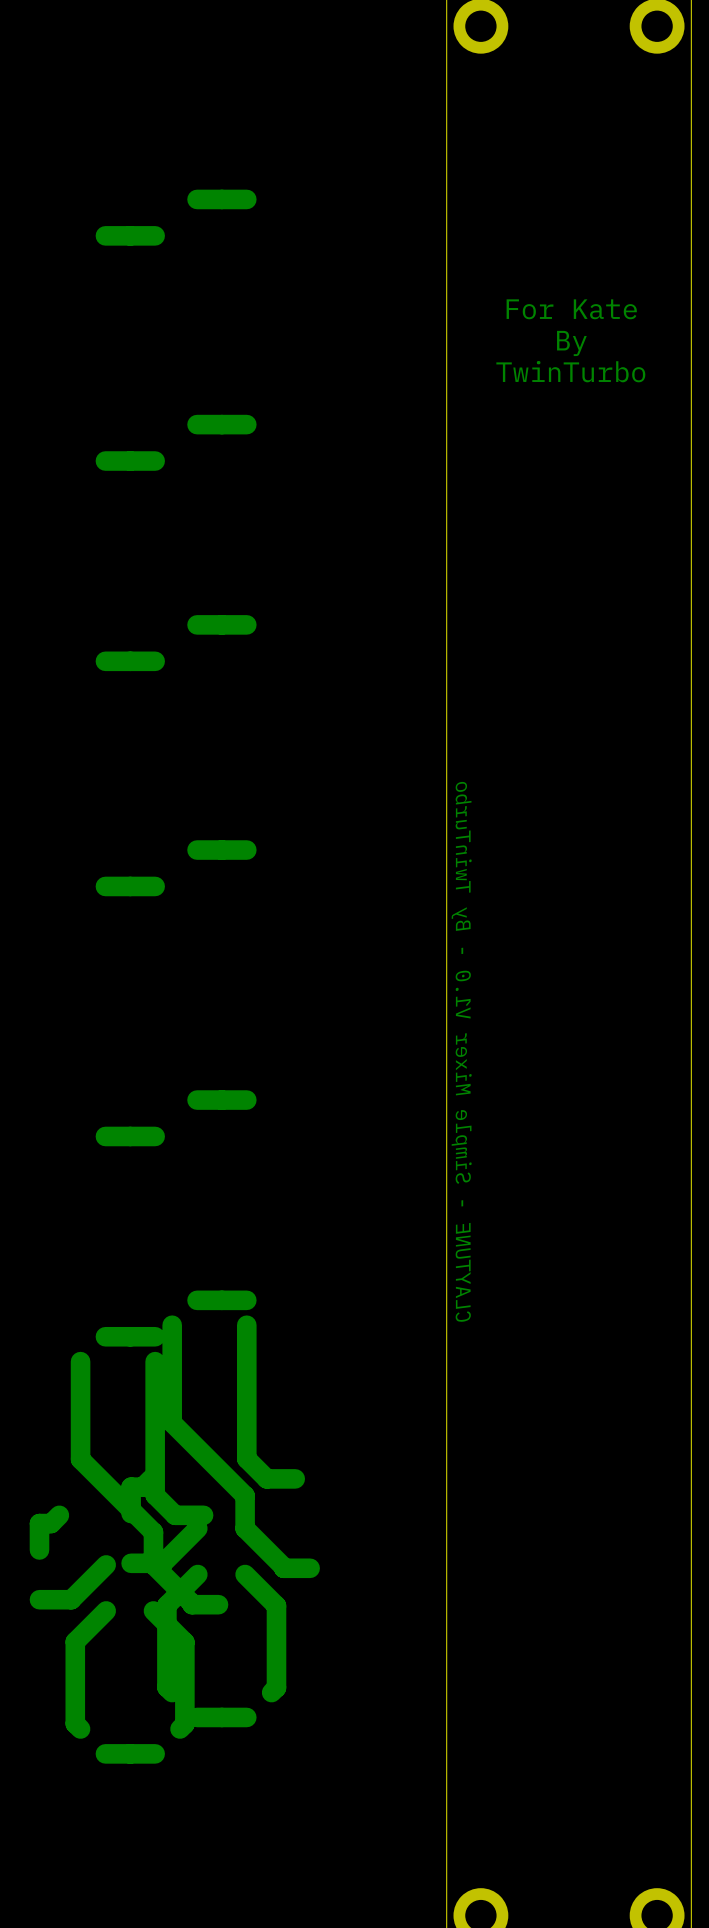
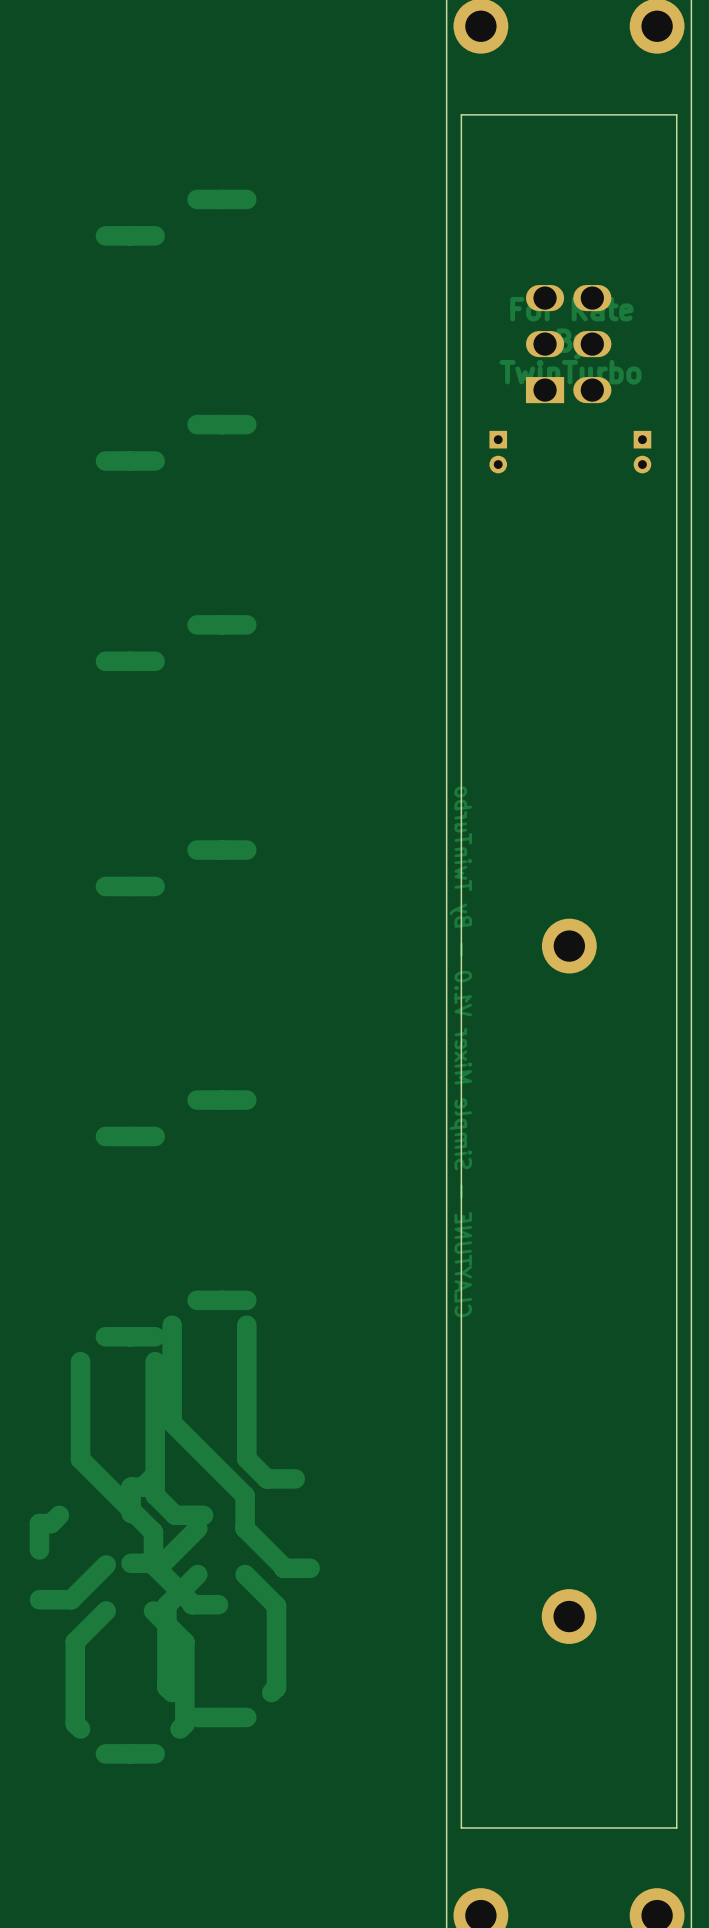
board edge: none -> (676, 114) (461, 114) (461, 1827) (676, 1827) (676, 114)
part: none -> (568, 344)
part: none -> (498, 452)
part: none -> (642, 452)
part: none -> (569, 946)
part: none -> (569, 1616)

